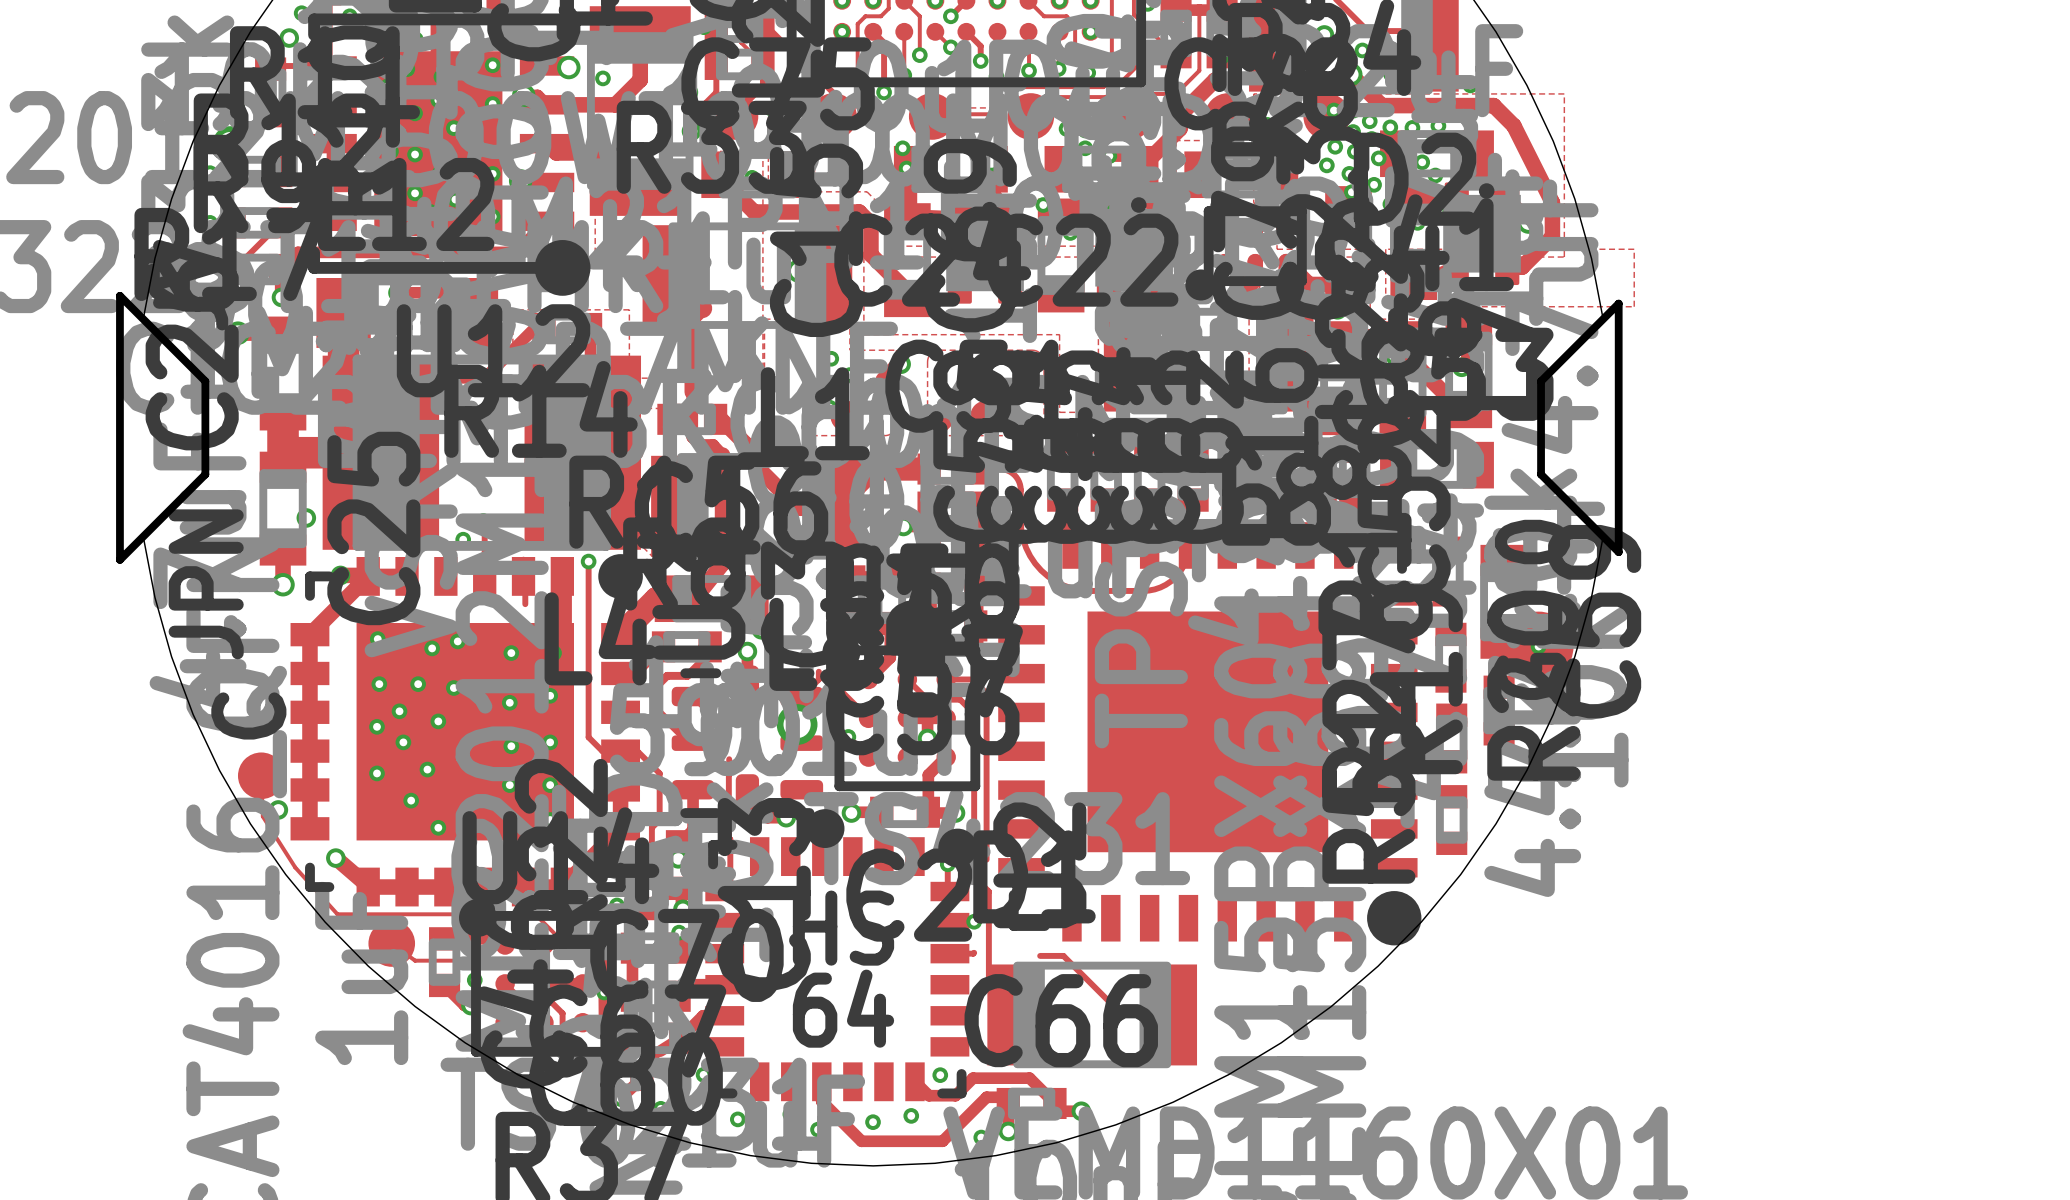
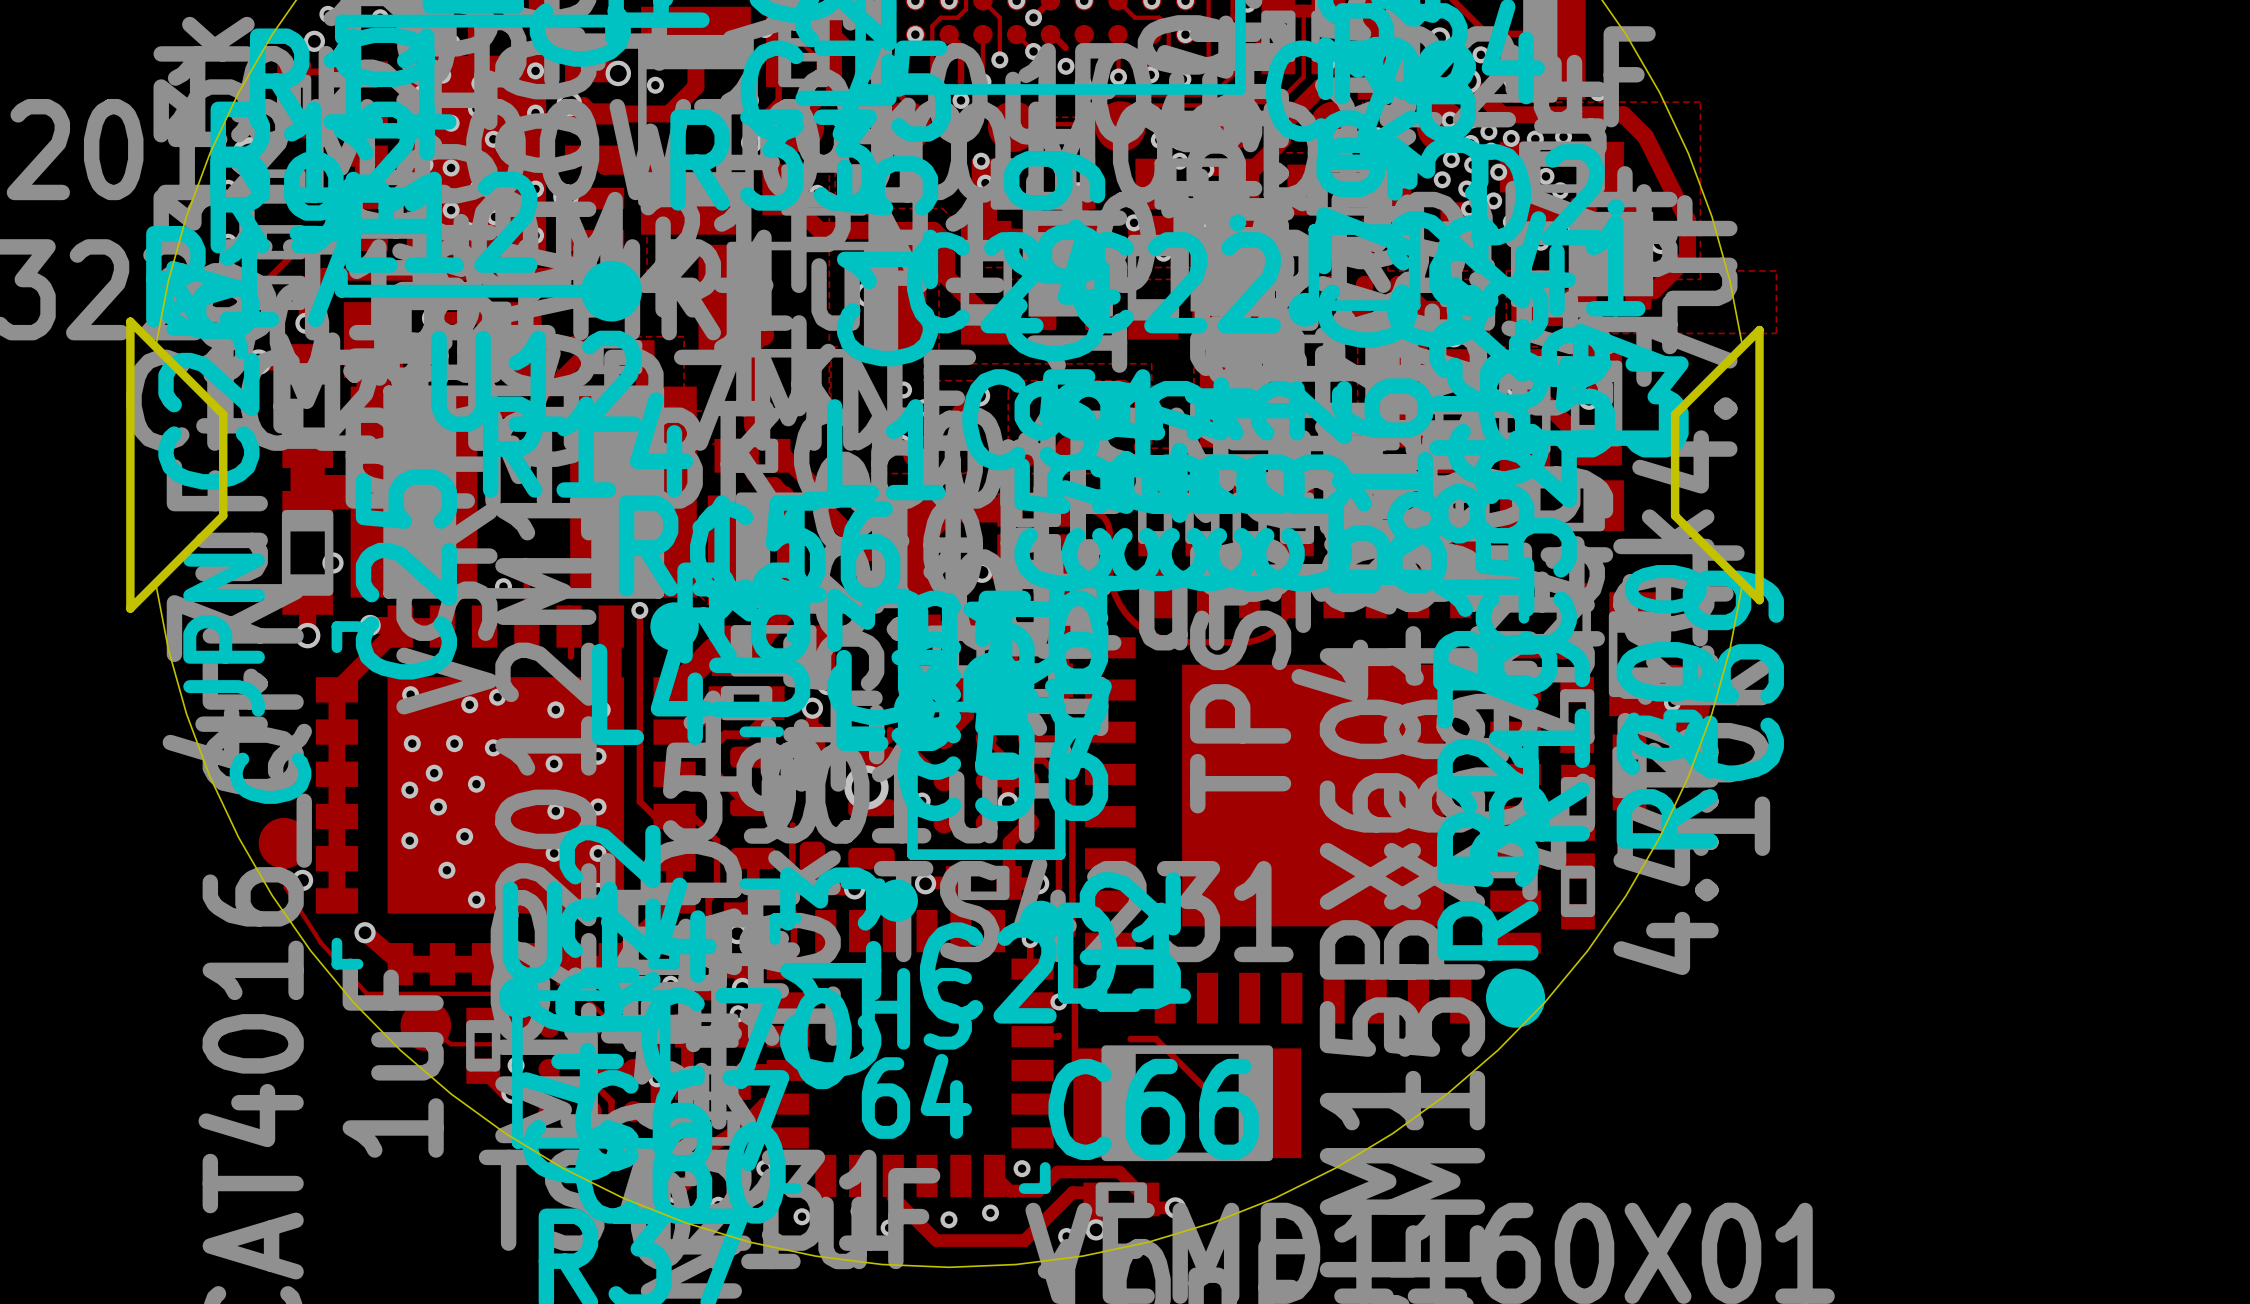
track: (966, 31) (980, 46) (980, 61) -> (1050, 34) (1065, 47)

